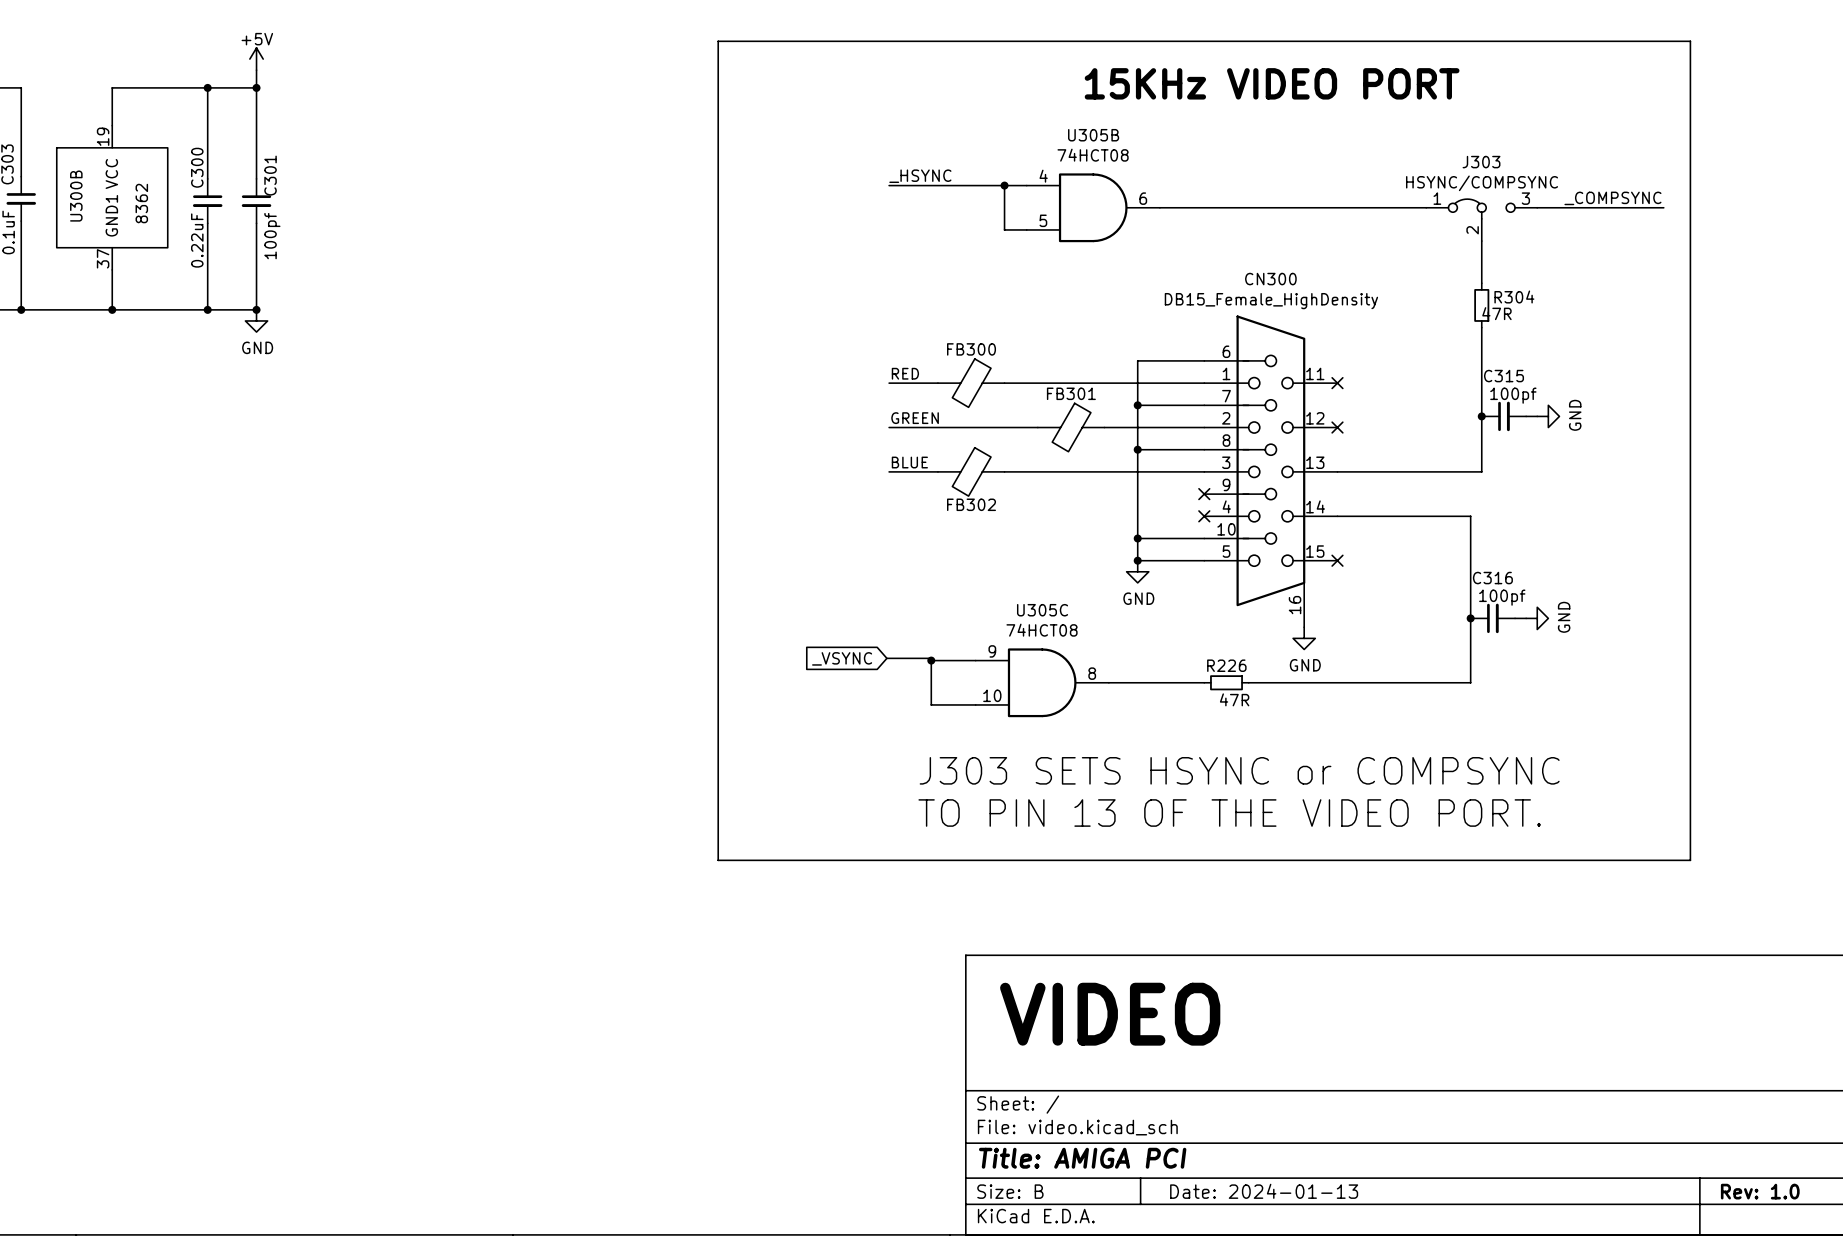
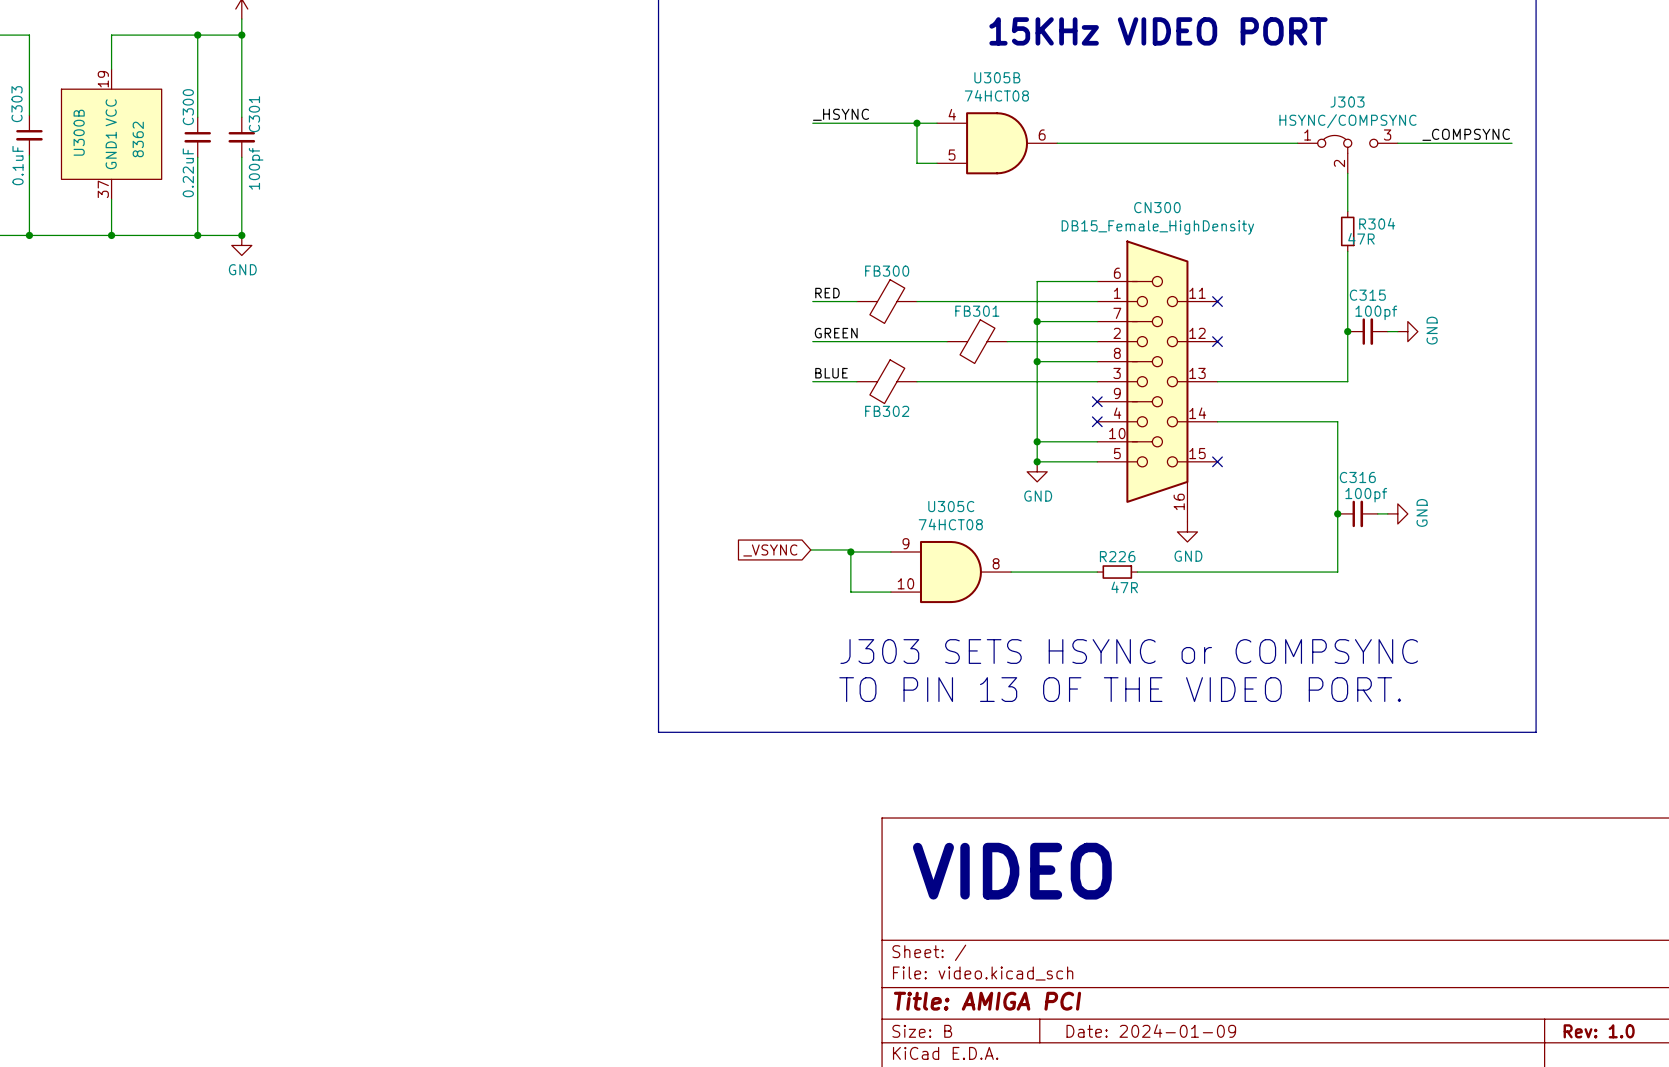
title block: Date: 2024-01-13 (1264, 1191) -> Date: 2024-01-09 (1151, 1031)

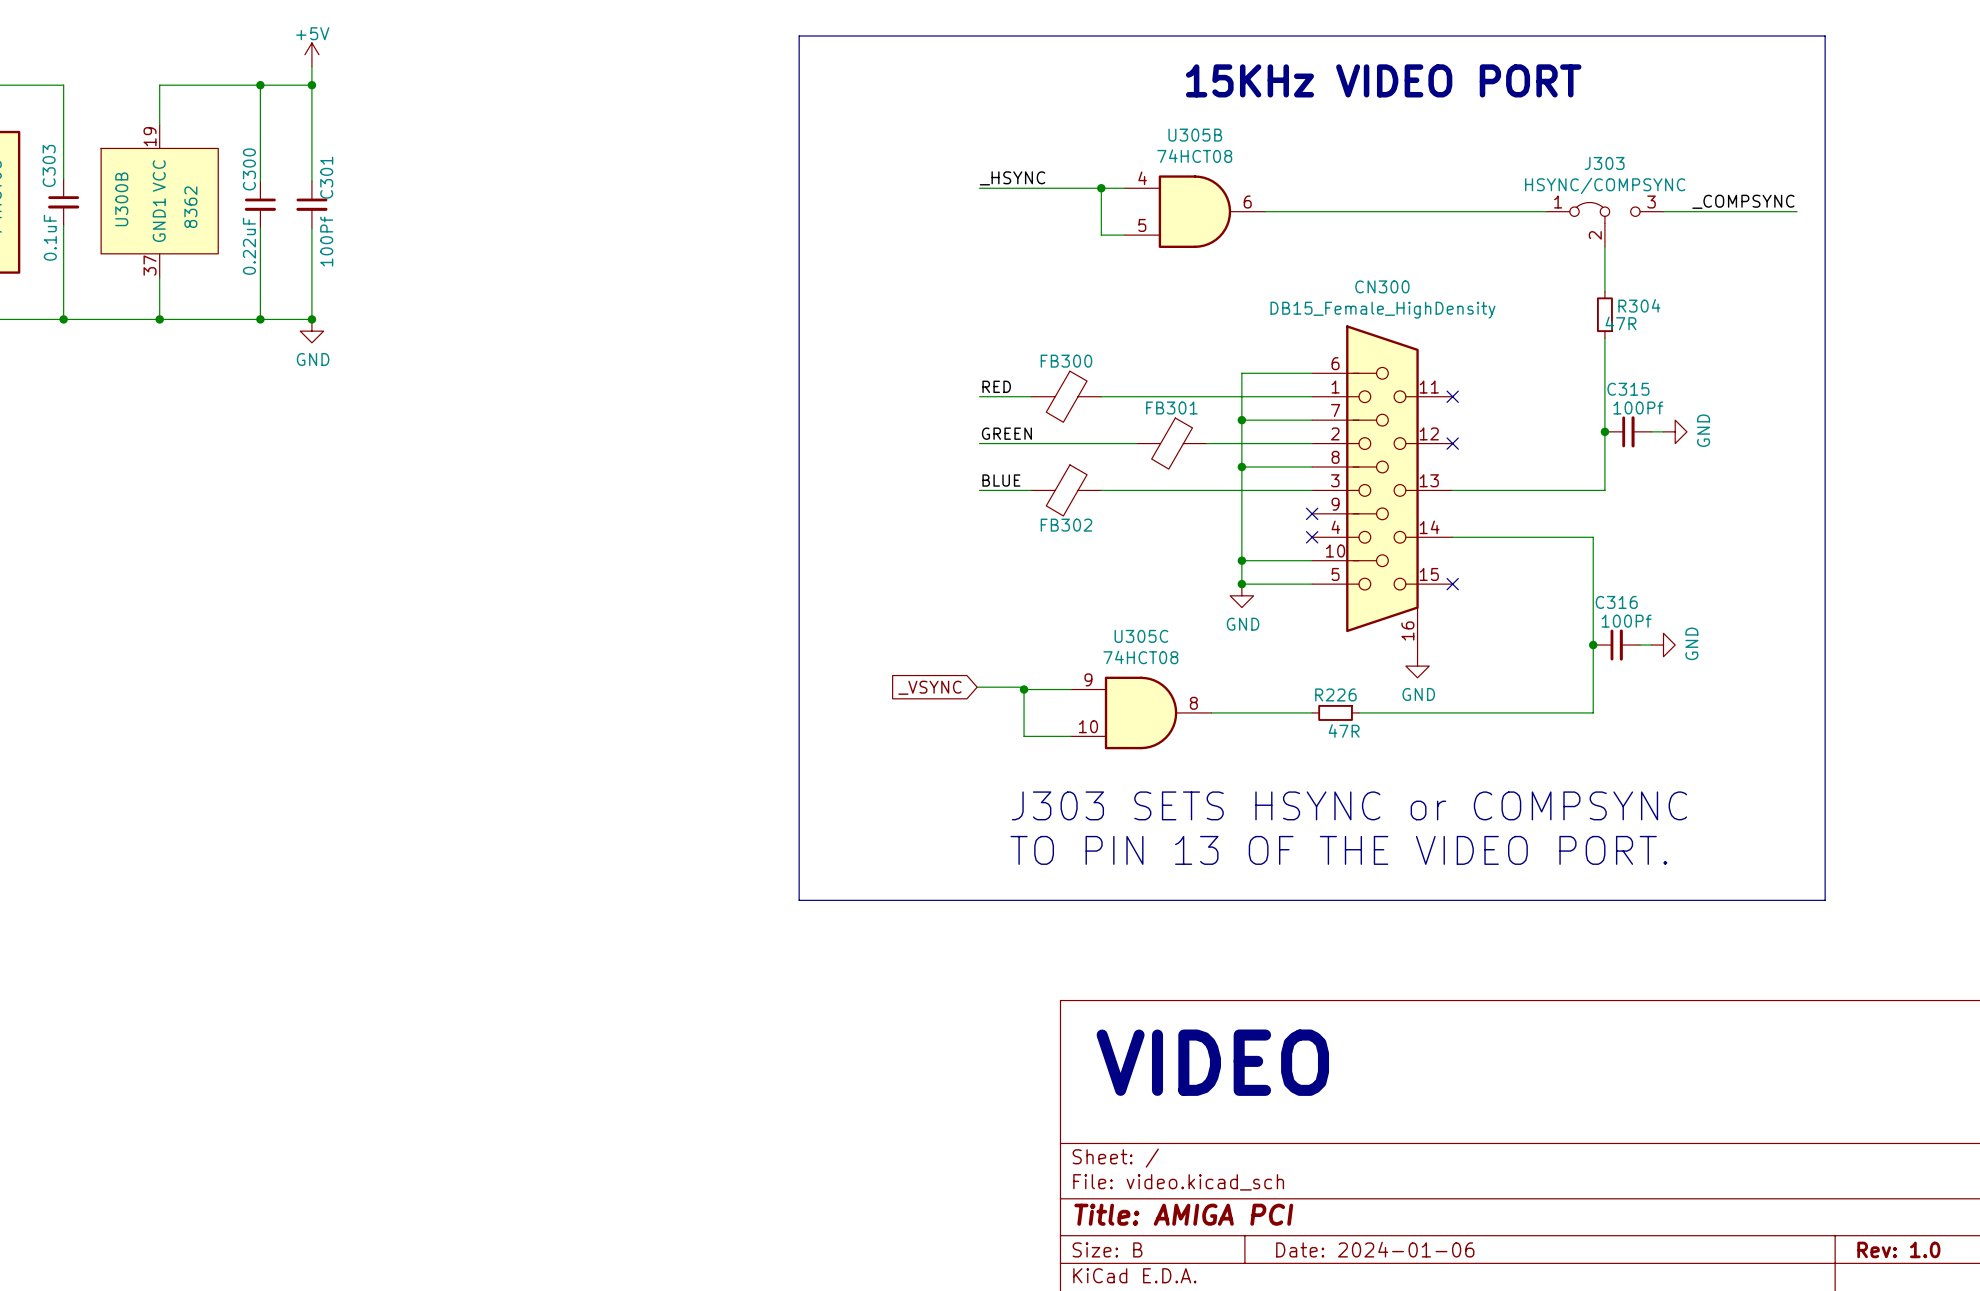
C301 value: 100pf (256, 168) -> 100Pf (326, 241)
C315 value: 100pf (1376, 312) -> 100Pf (1638, 408)
C316 value: 100pf (1366, 495) -> 100Pf (1626, 621)
title block: Date: 2024-01-09 (1151, 1031) -> Date: 2024-01-06 (1375, 1249)

